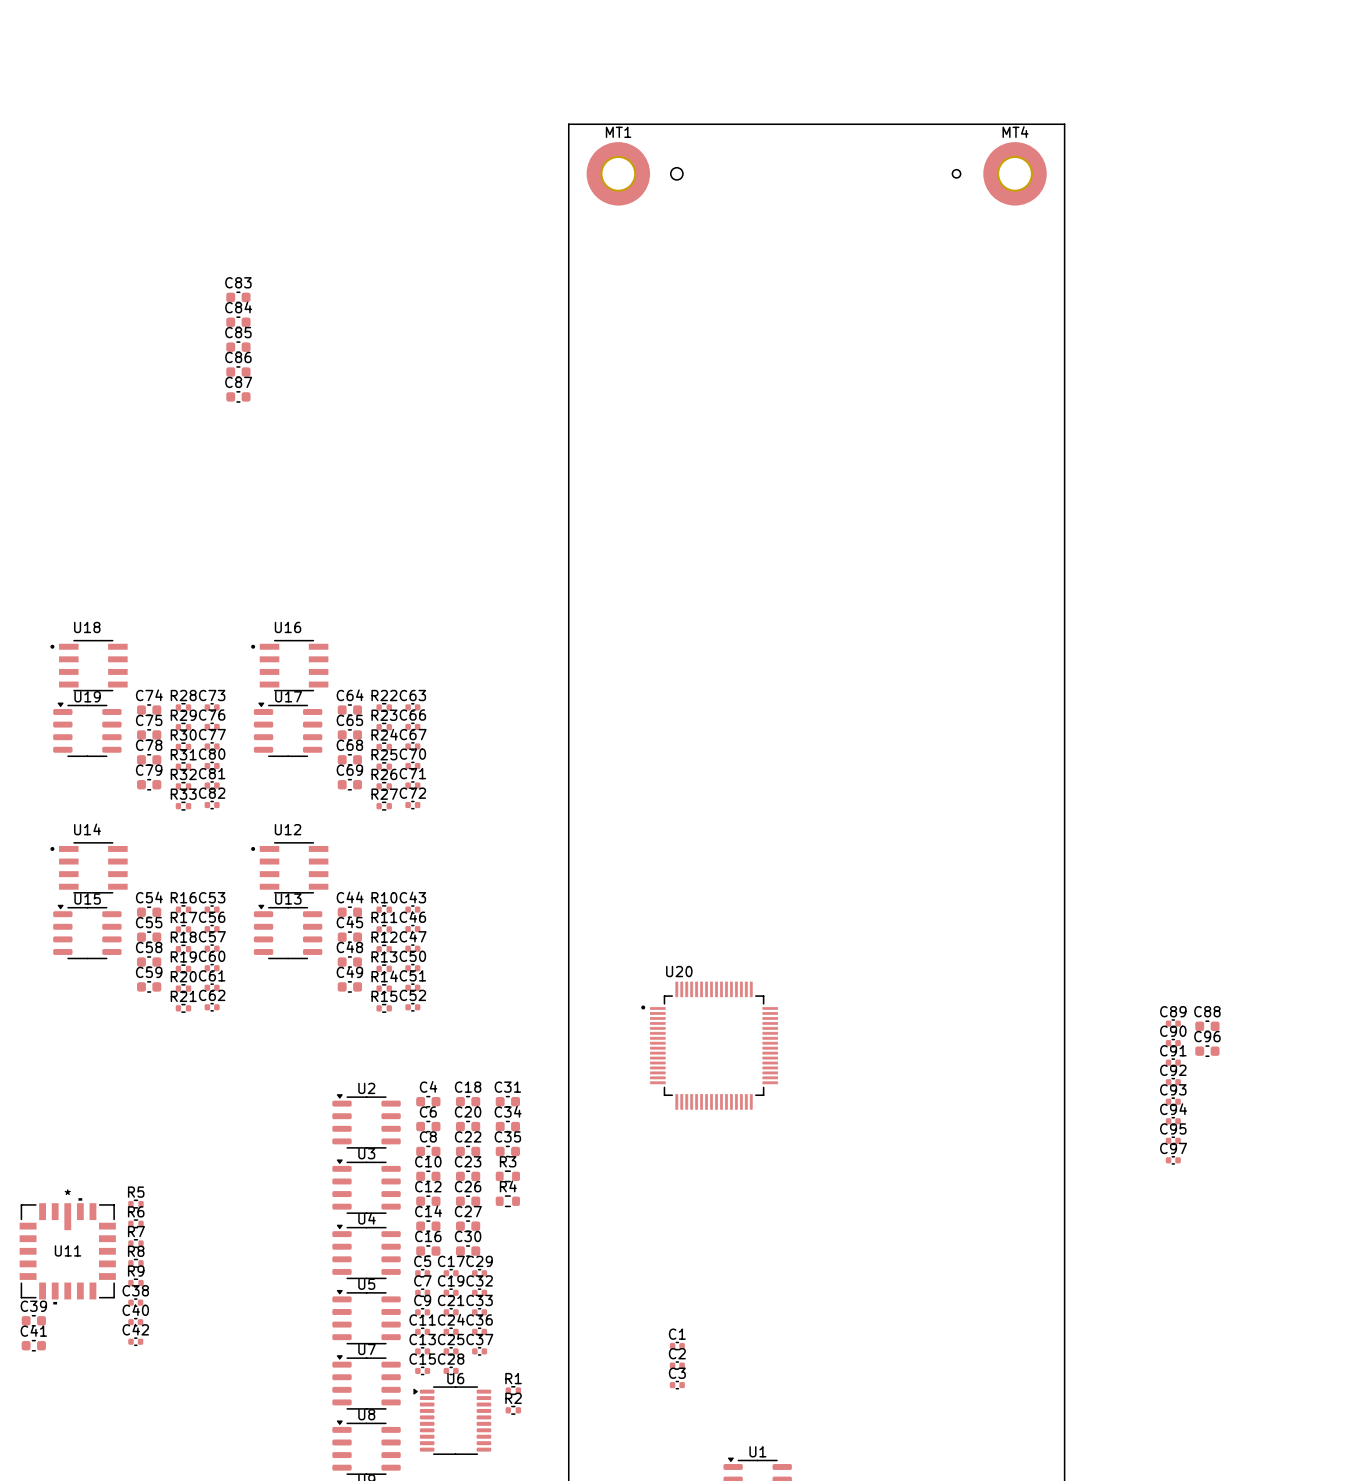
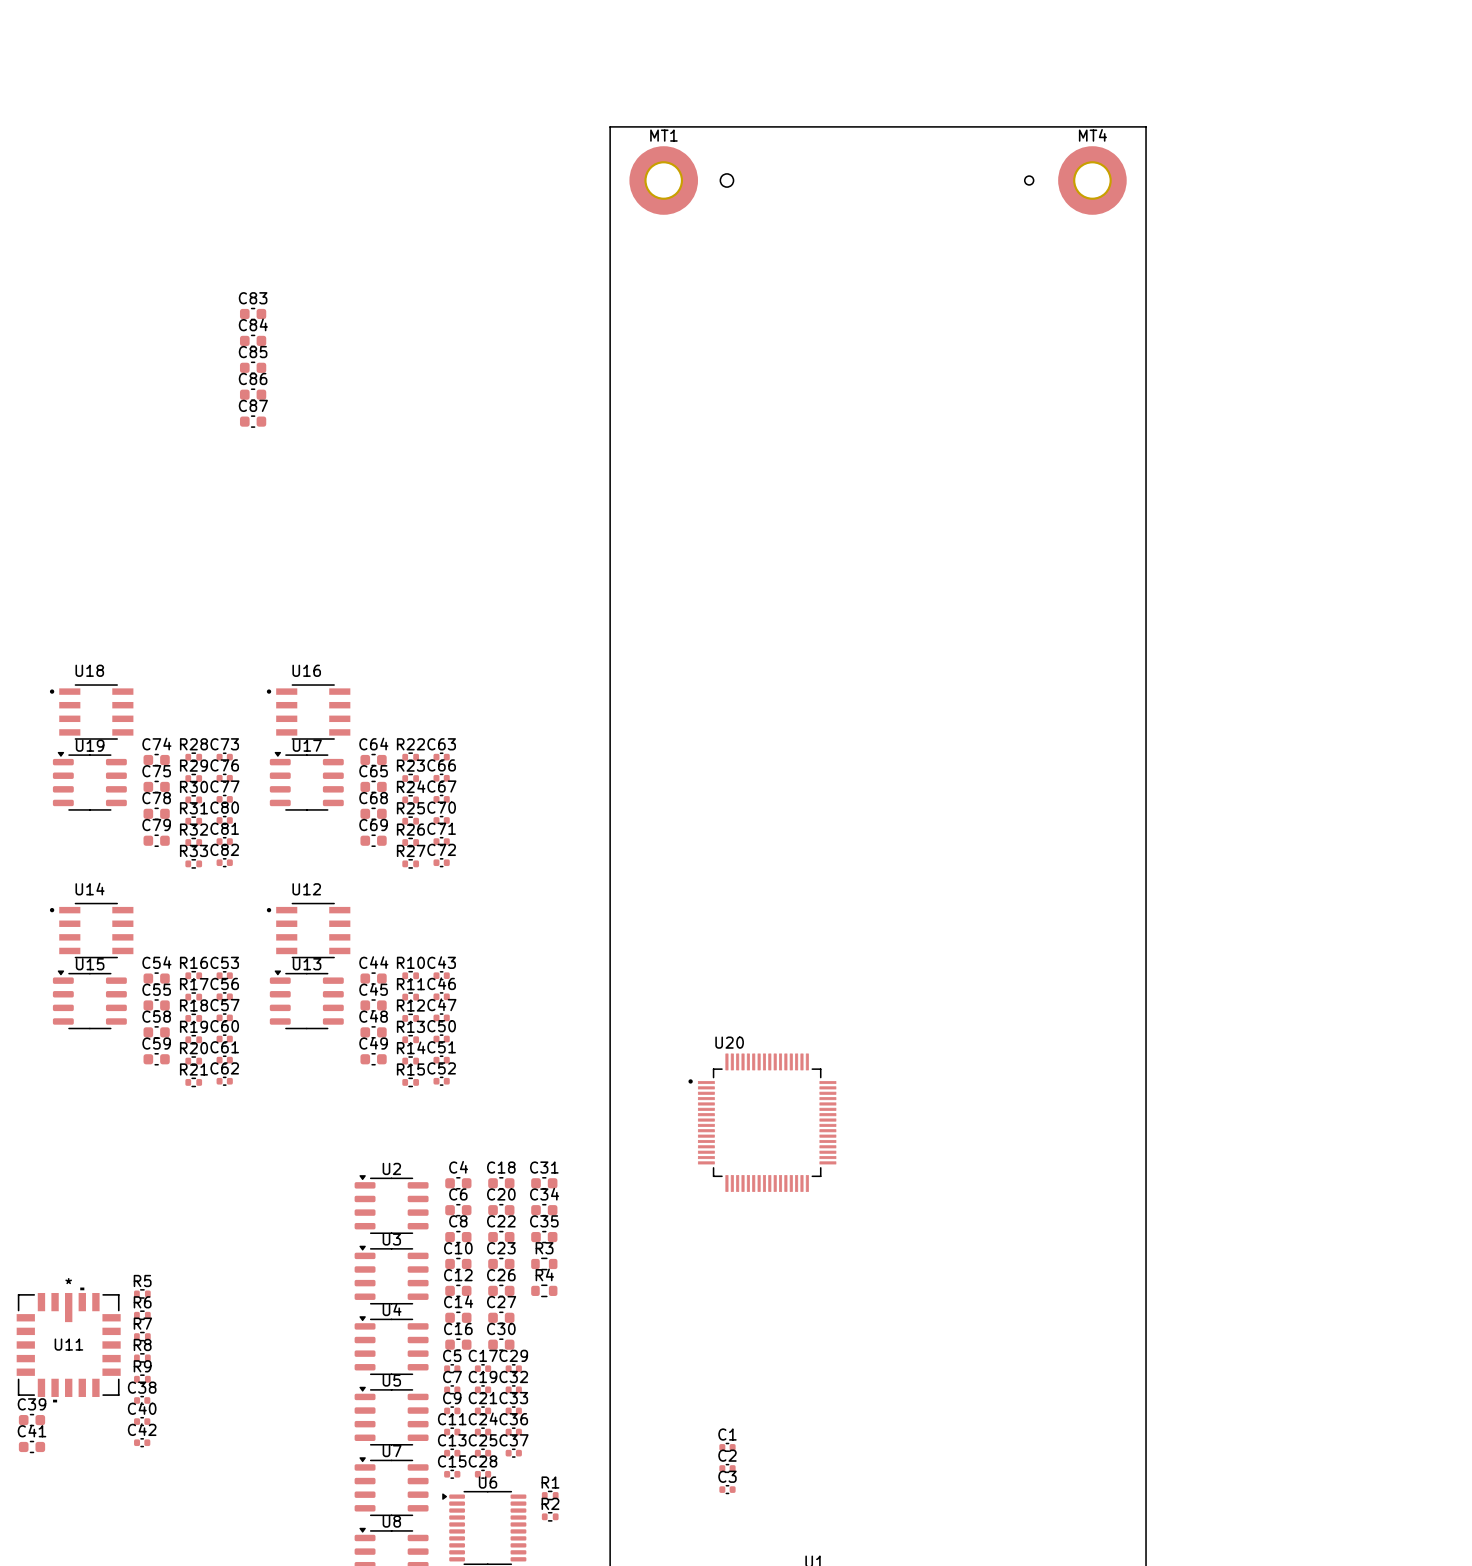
C89: (1173, 1023) -> none
C88: (1207, 1026) -> none
C90: (1173, 1043) -> none
C96: (1207, 1051) -> none
C91: (1173, 1062) -> none
C92: (1173, 1082) -> none
C93: (1173, 1101) -> none
C94: (1173, 1121) -> none
C95: (1173, 1140) -> none
C97: (1173, 1160) -> none

